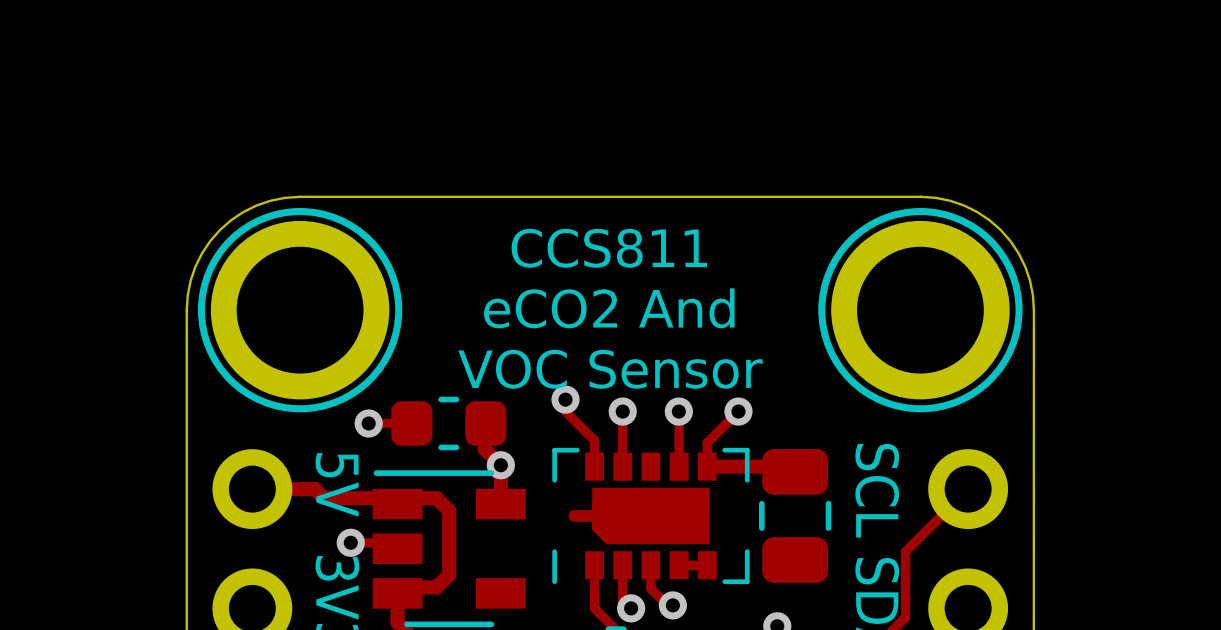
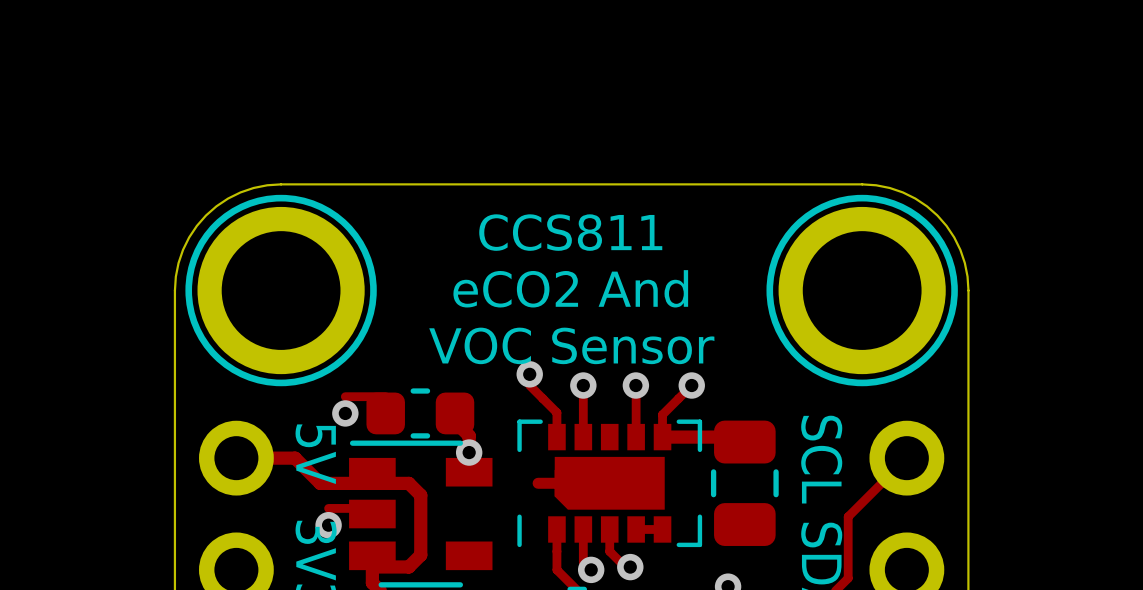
via position: (368, 423) -> (345, 413)
part position: (448, 423) -> (420, 413)
via position: (500, 465) -> (469, 452)
track: (324, 498) (436, 498) (449, 510) (449, 528) -> (303, 466) (320, 483) (408, 483) (420, 495)
via position: (350, 542) -> (328, 525)
track: (449, 574) (436, 587) (397, 587) -> (420, 538) (420, 555) (408, 566) (372, 566)

